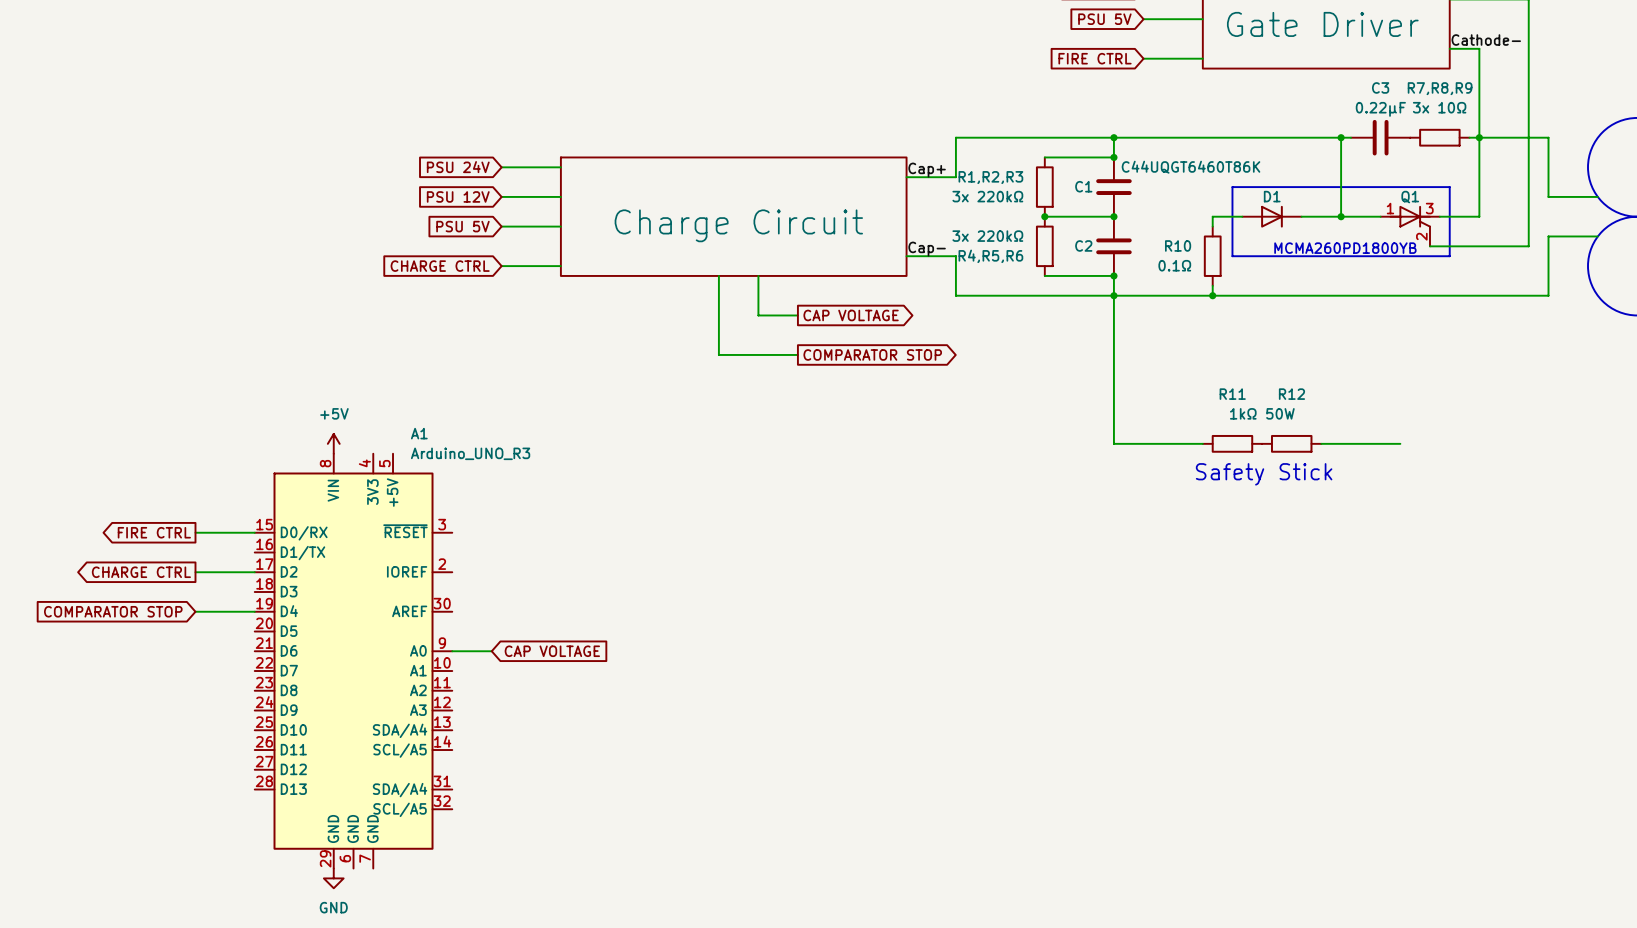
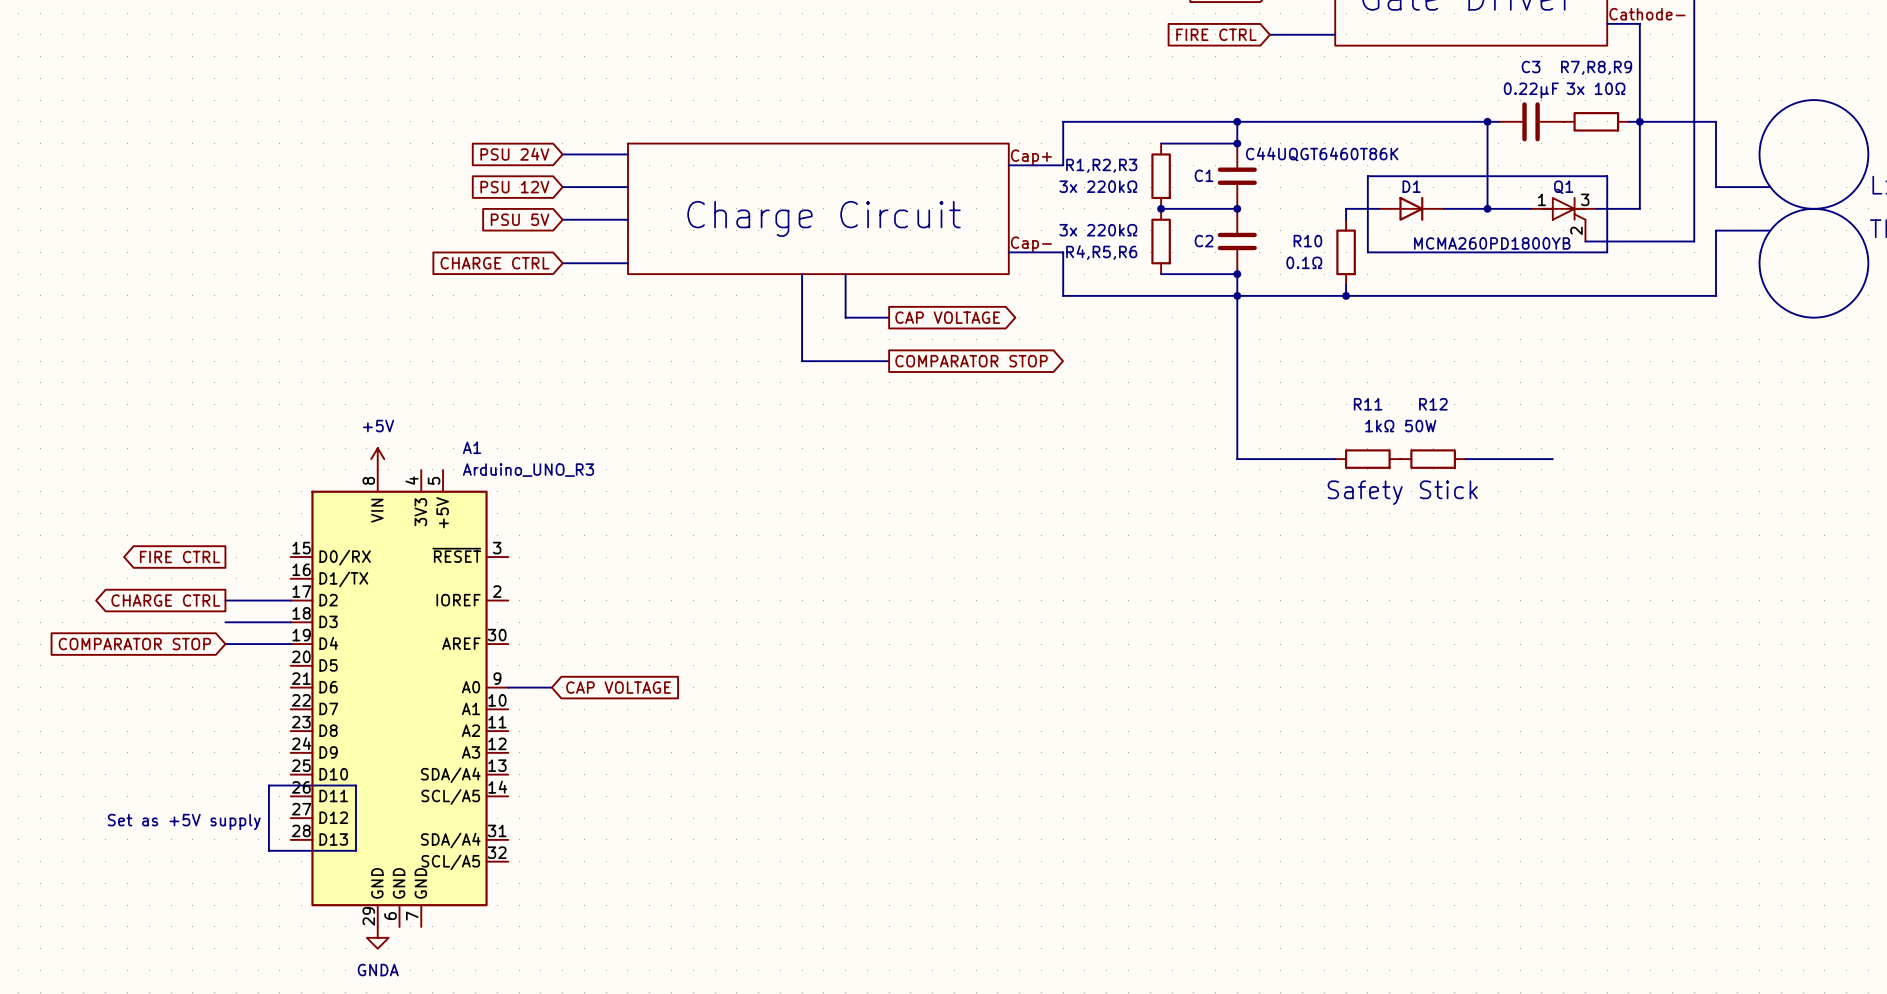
wire: (195, 532) (254, 532) -> (225, 622) (290, 622)
line: none -> (268, 785) (355, 785) (355, 850) (268, 850) (268, 785)
text: none -> Set as +5V supply (184, 821)
power symbol: GND (333, 878) -> GNDA (377, 937)

